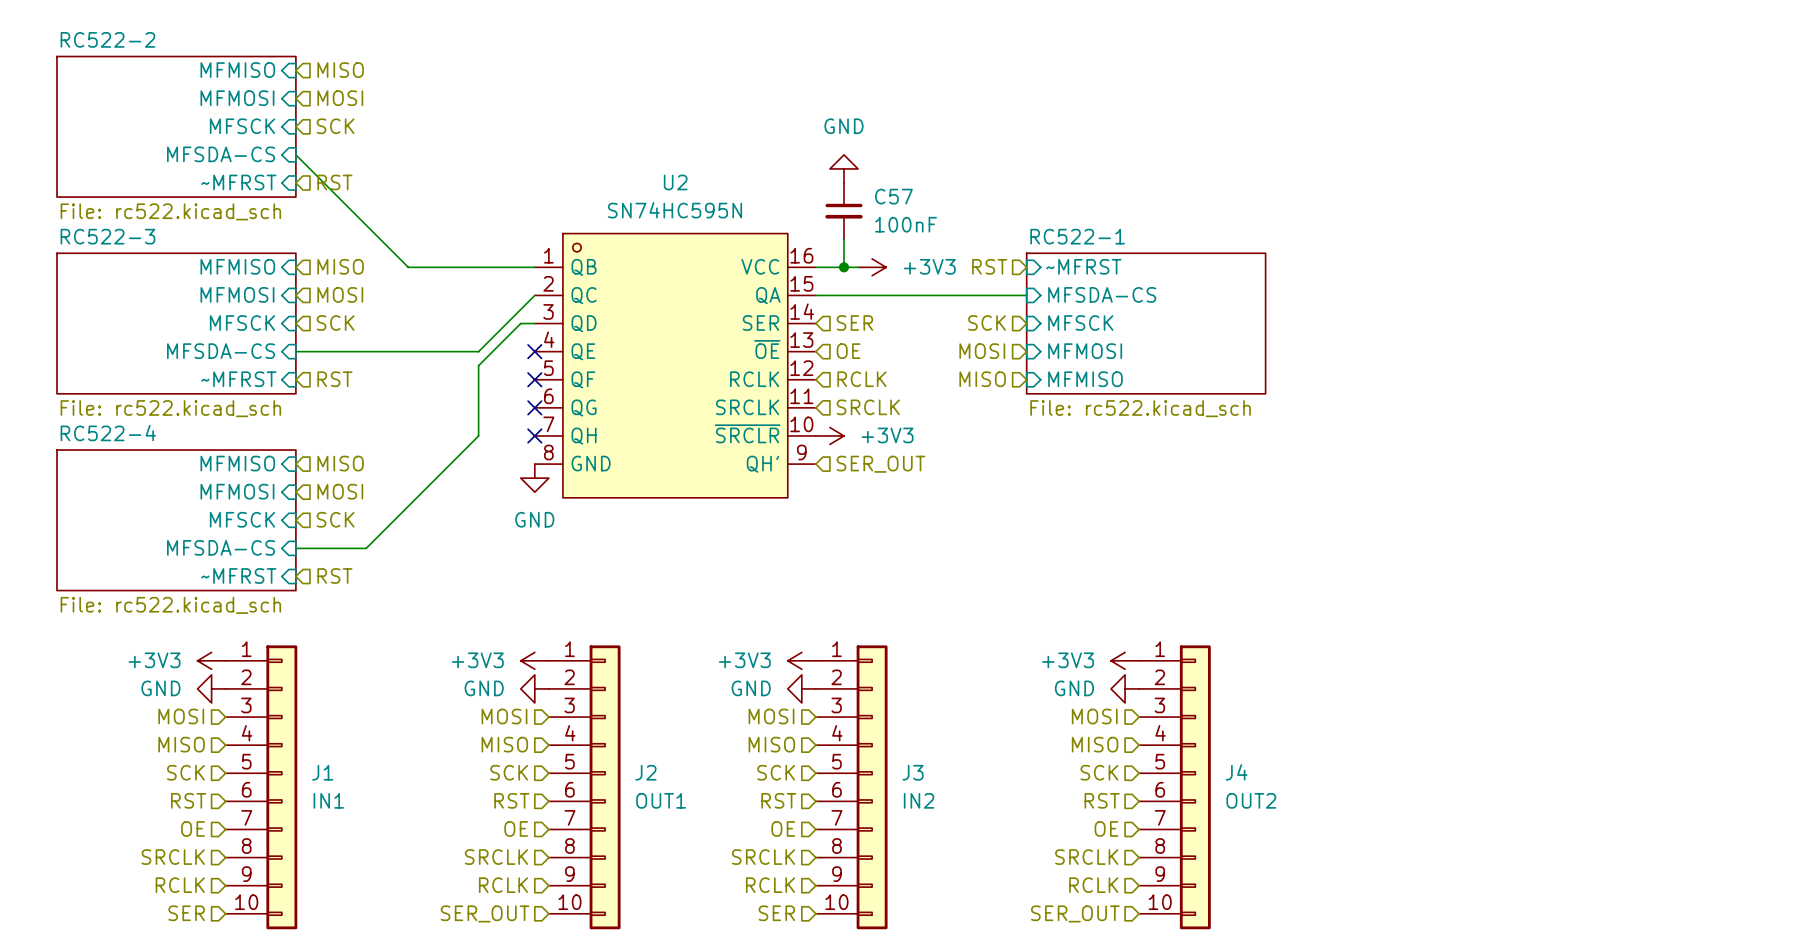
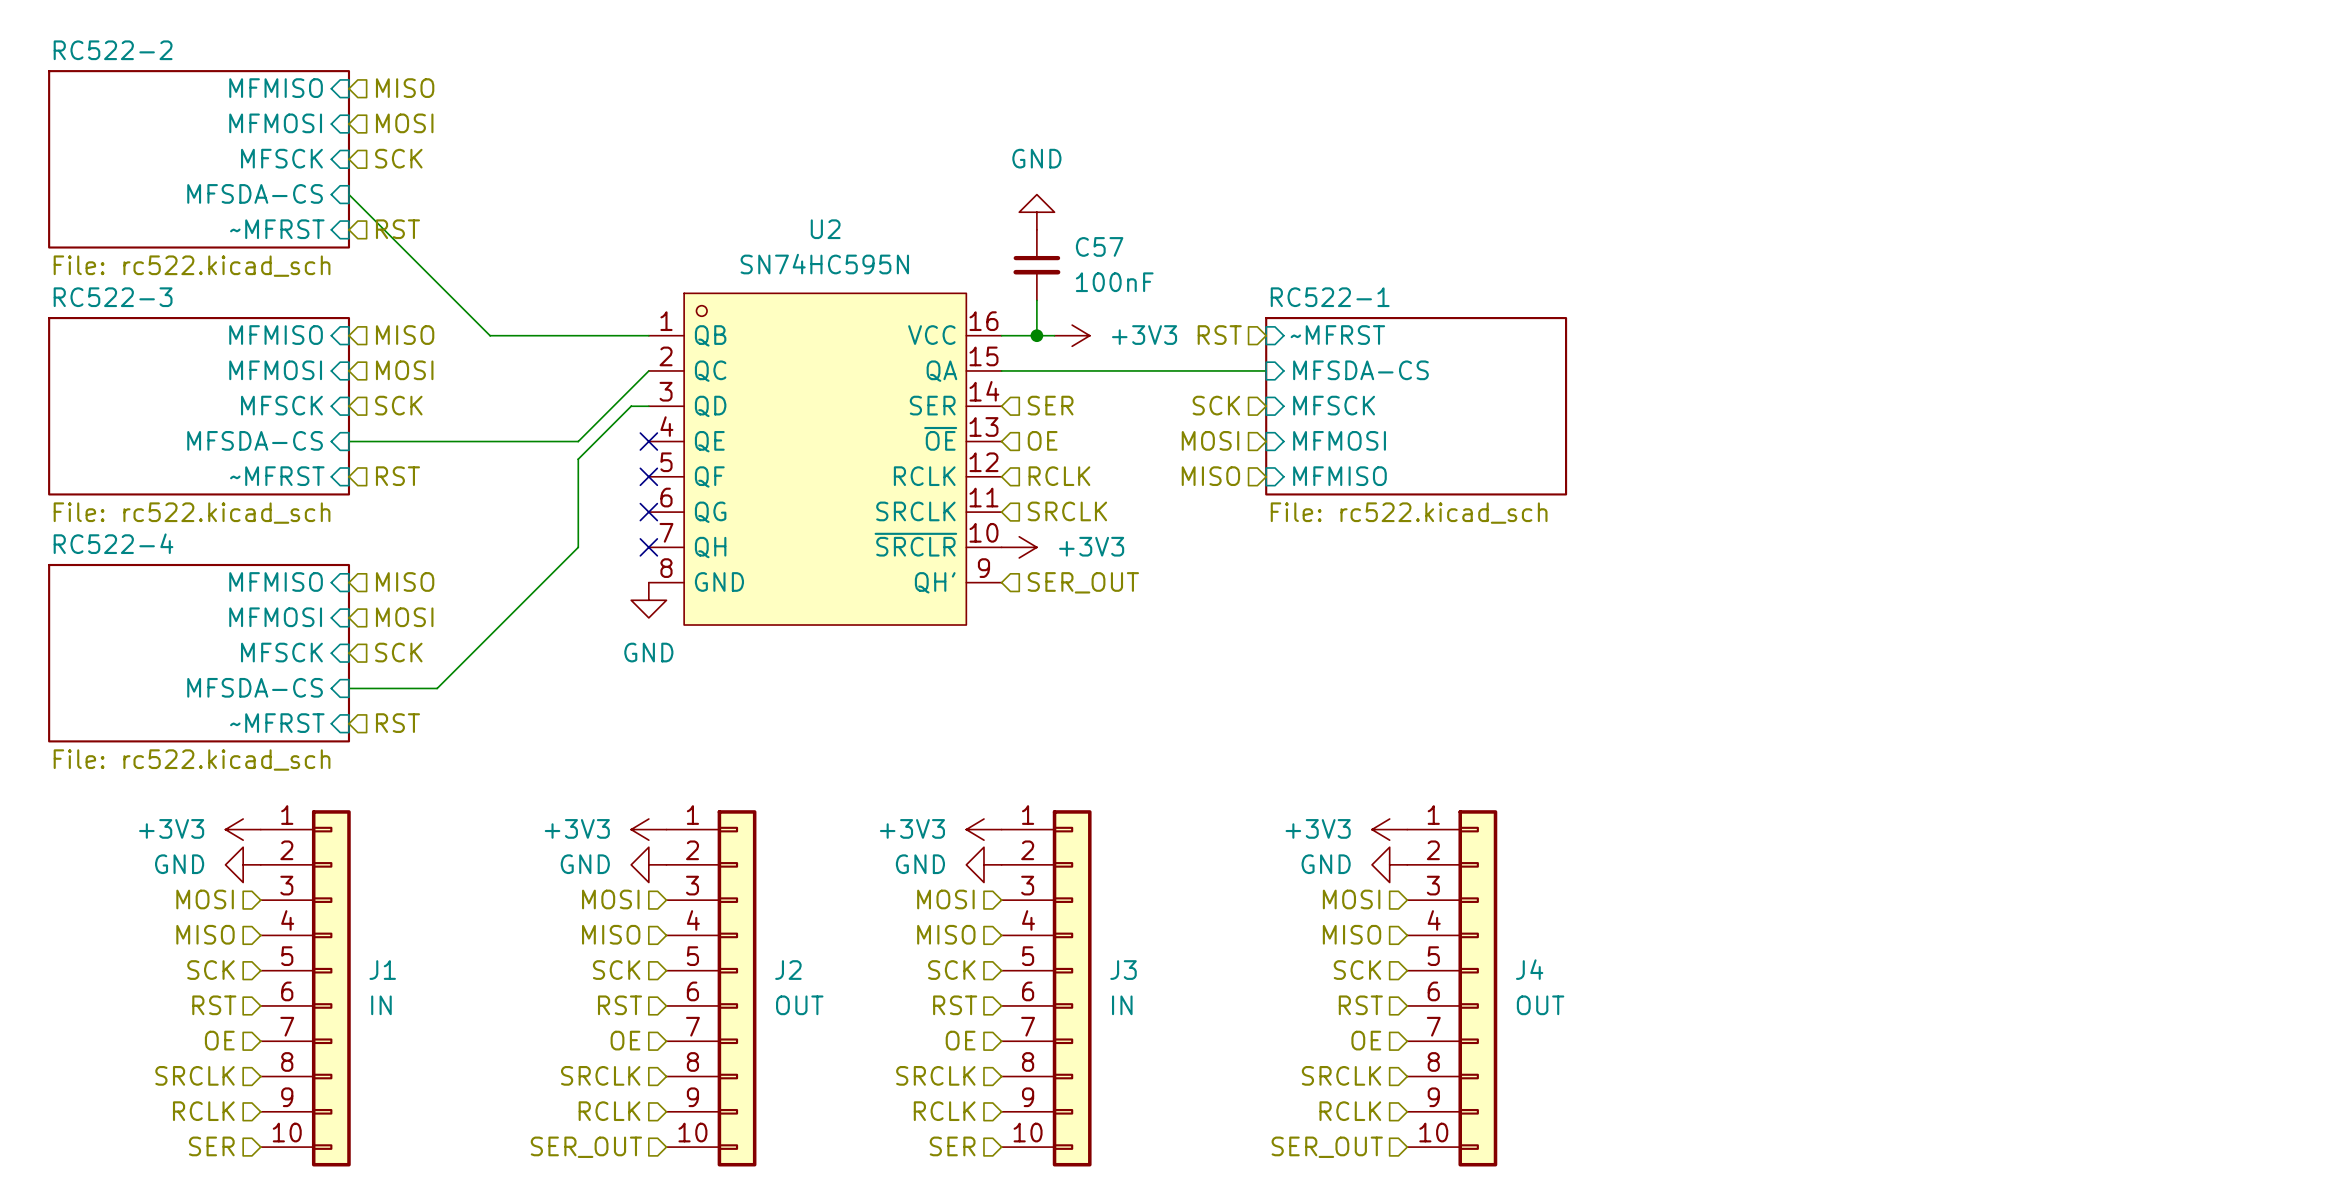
J1 value: IN1 (328, 800) -> IN (381, 1005)
J2 value: OUT1 (661, 800) -> OUT (799, 1005)
J3 value: IN2 (919, 800) -> IN (1122, 1005)
J4 value: OUT2 (1251, 800) -> OUT (1540, 1005)

